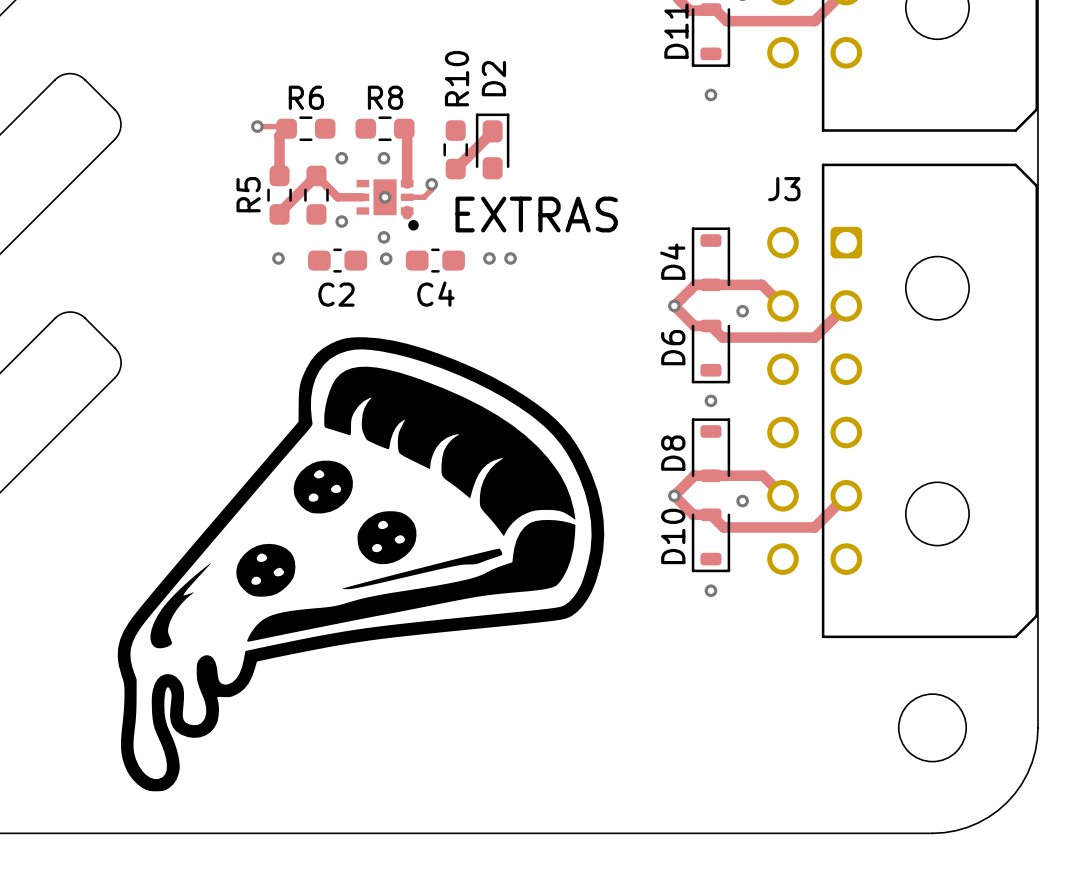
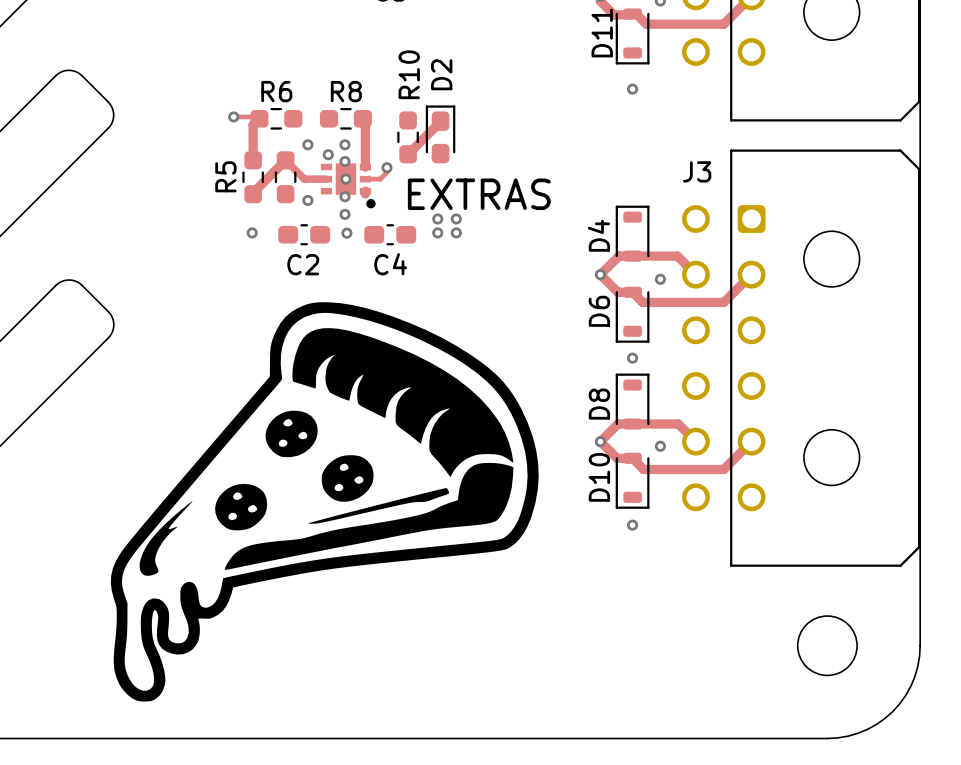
via: none -> (328, 154)
via: none -> (345, 161)
via: none -> (345, 196)
via: none -> (437, 219)
via: none -> (456, 219)

